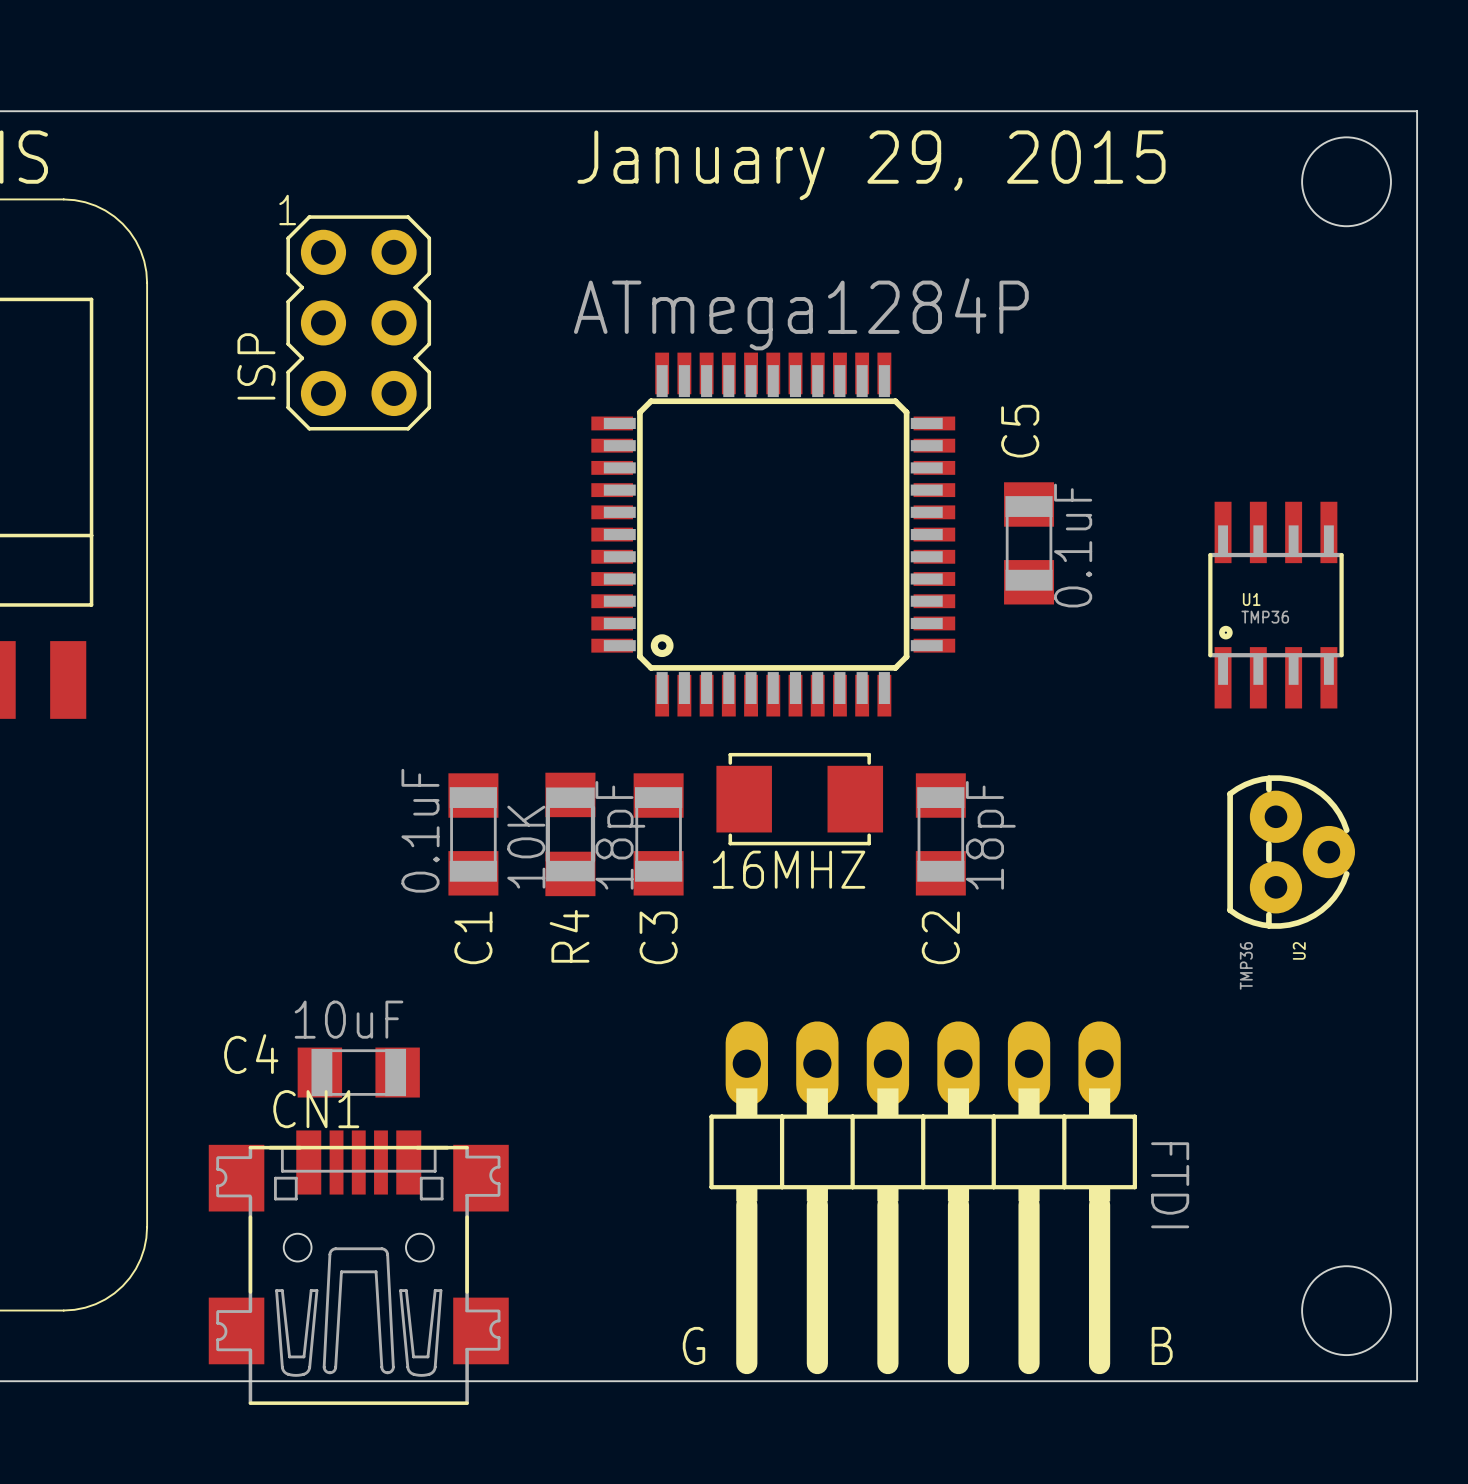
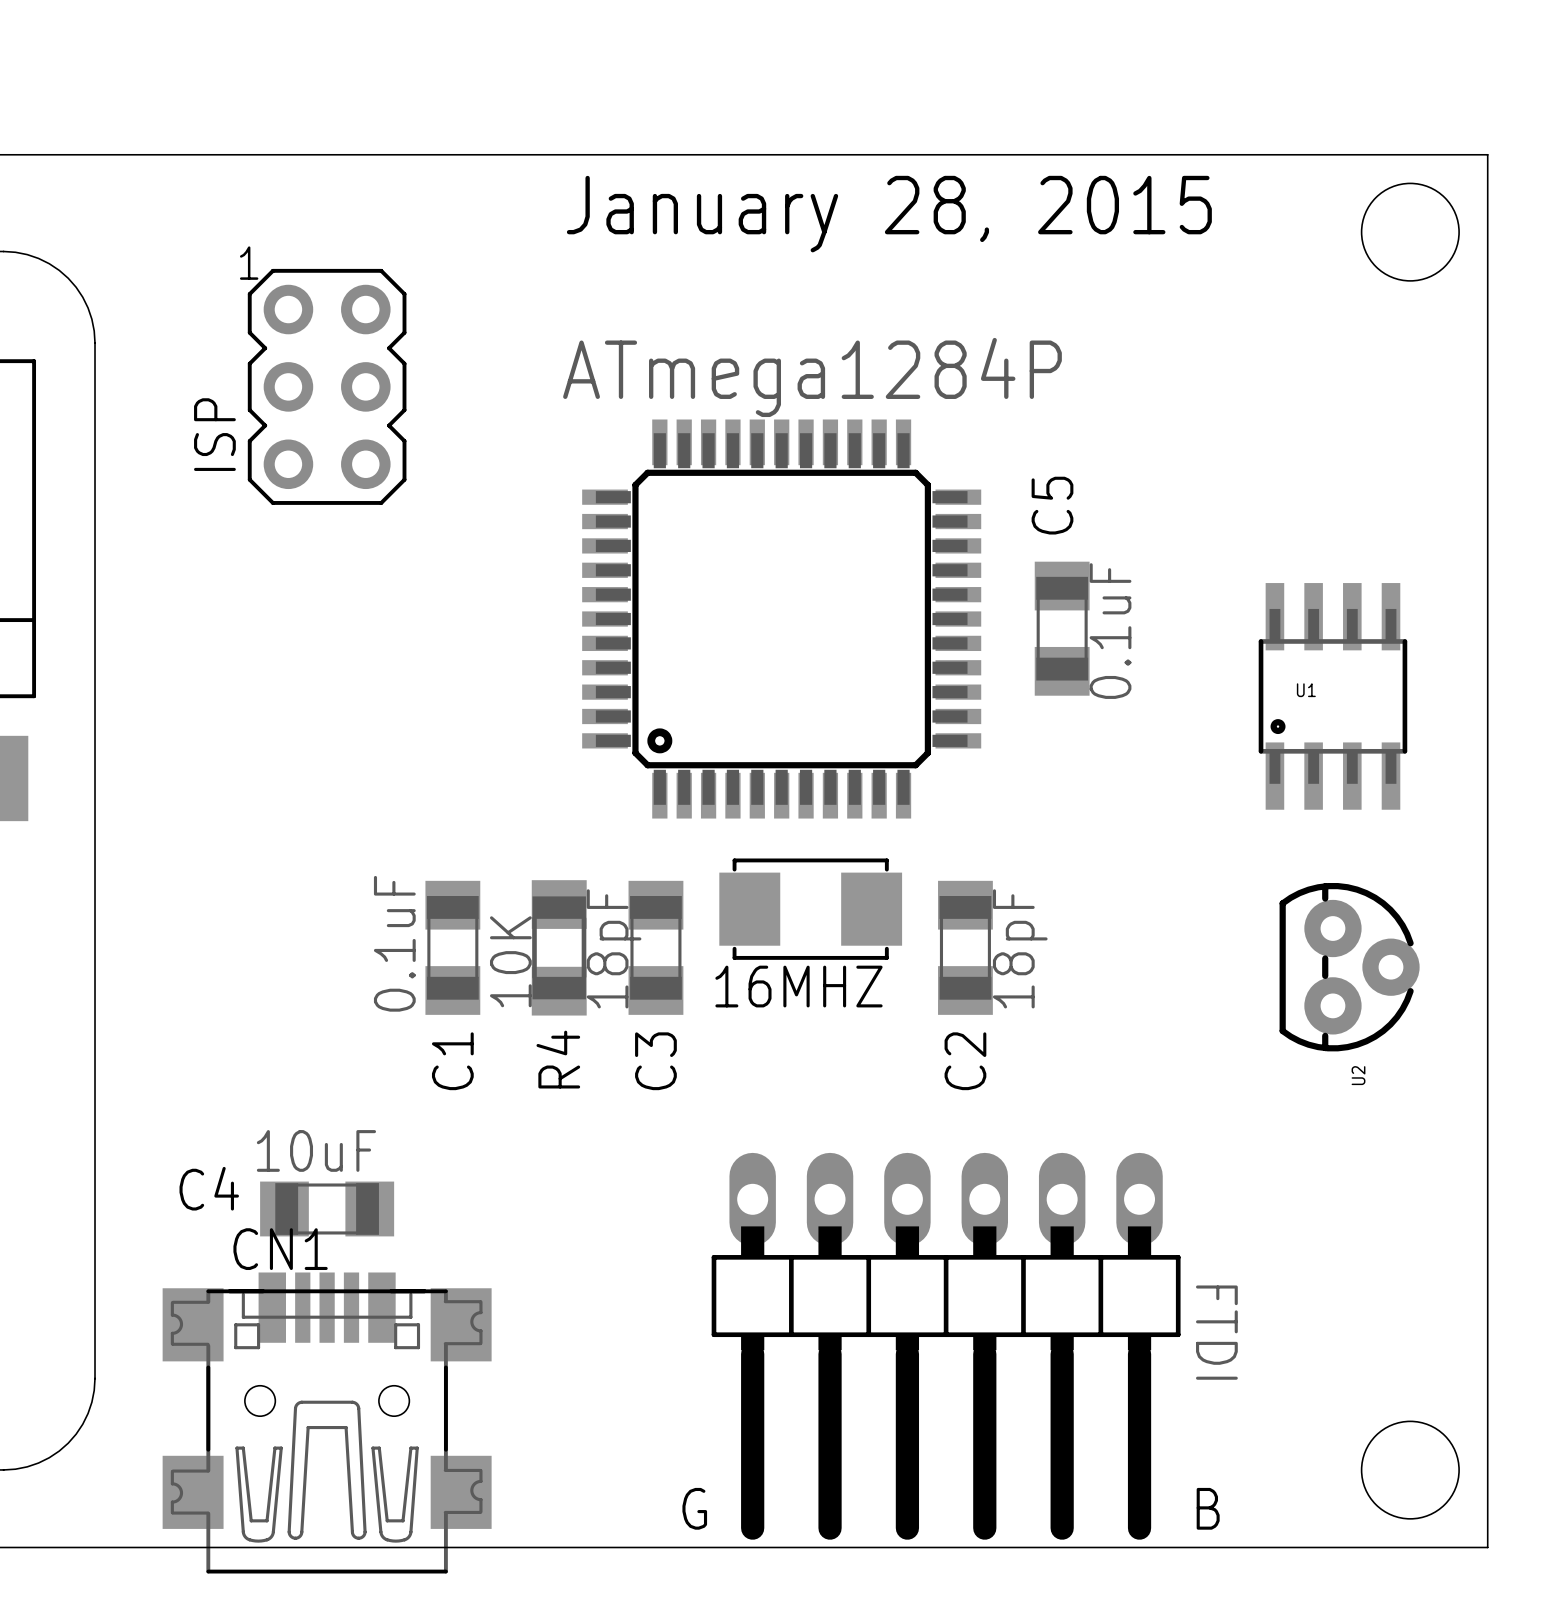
text: January 29, 2015 (871, 165) -> January 28, 2015 (889, 214)
U1 value: TMP36 (1265, 617) -> none
U2 value: TMP36 (1246, 965) -> none

